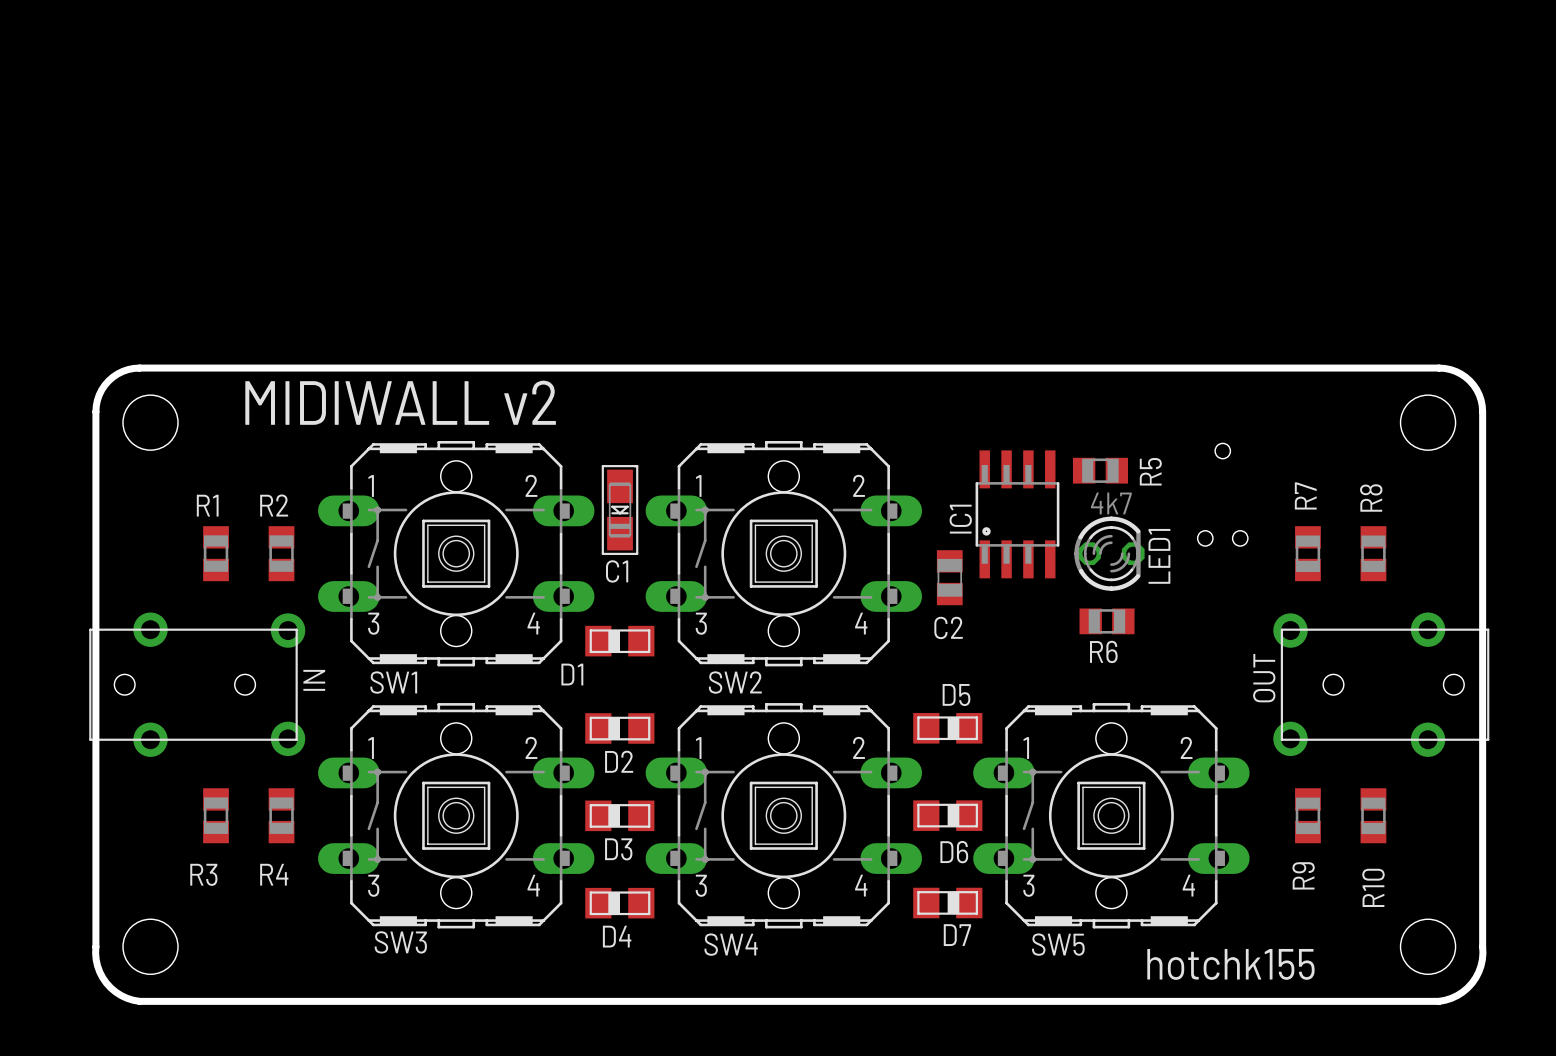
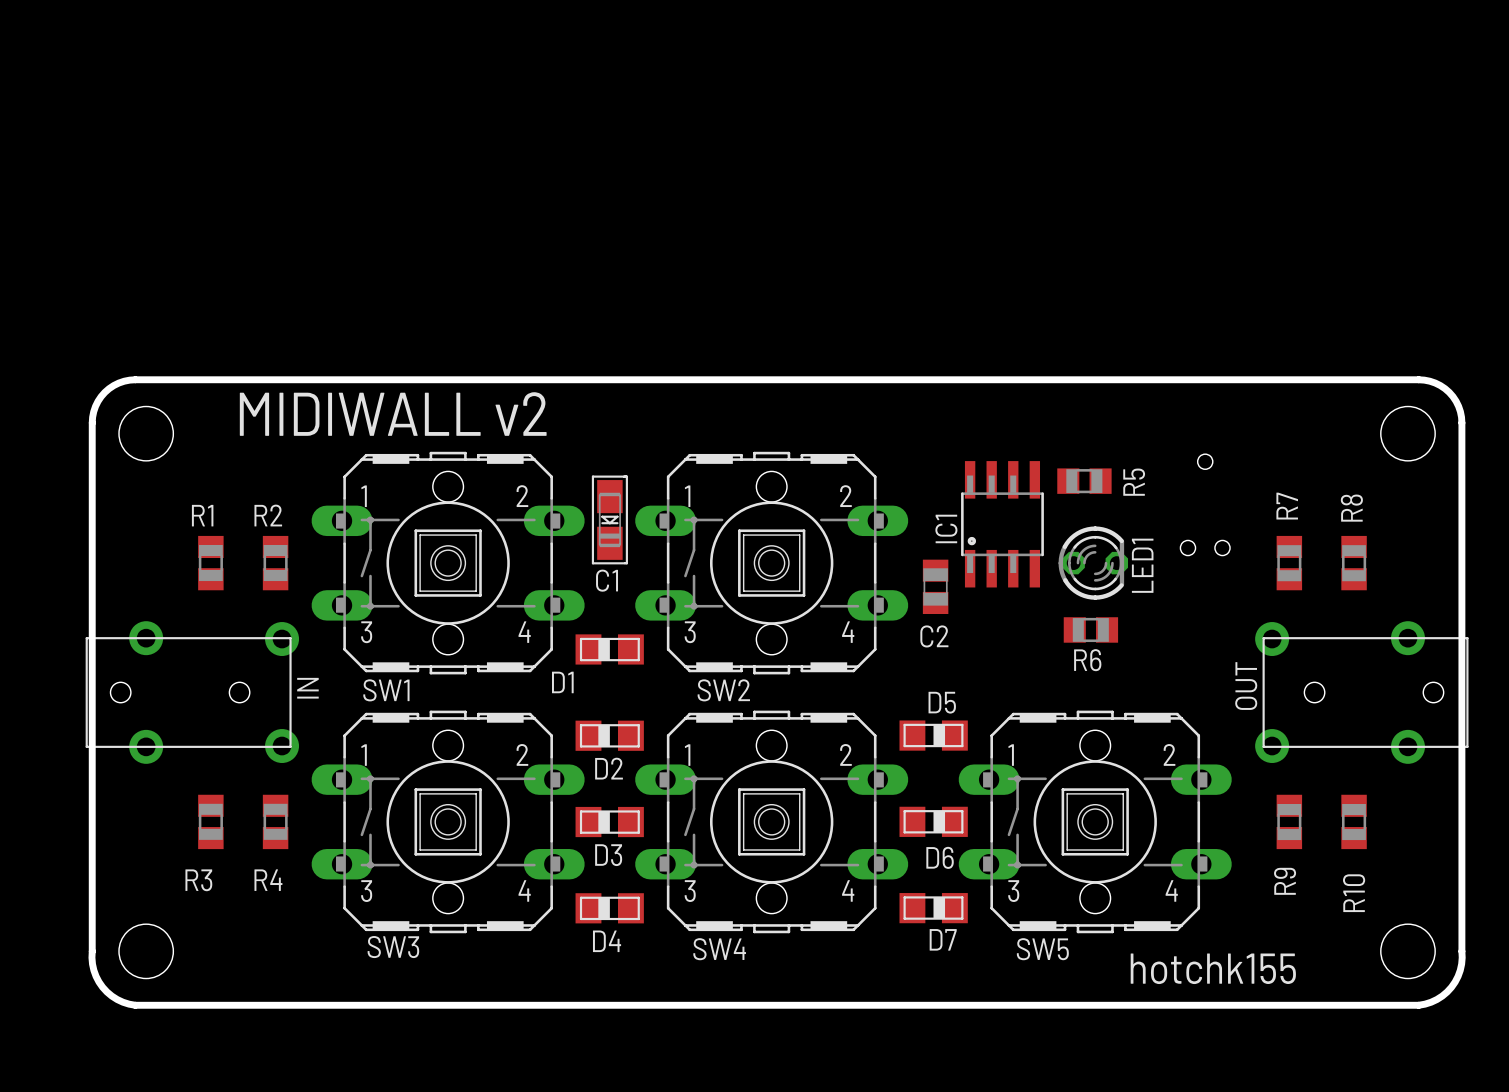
R5 value: 4k7 (1111, 503) -> none

